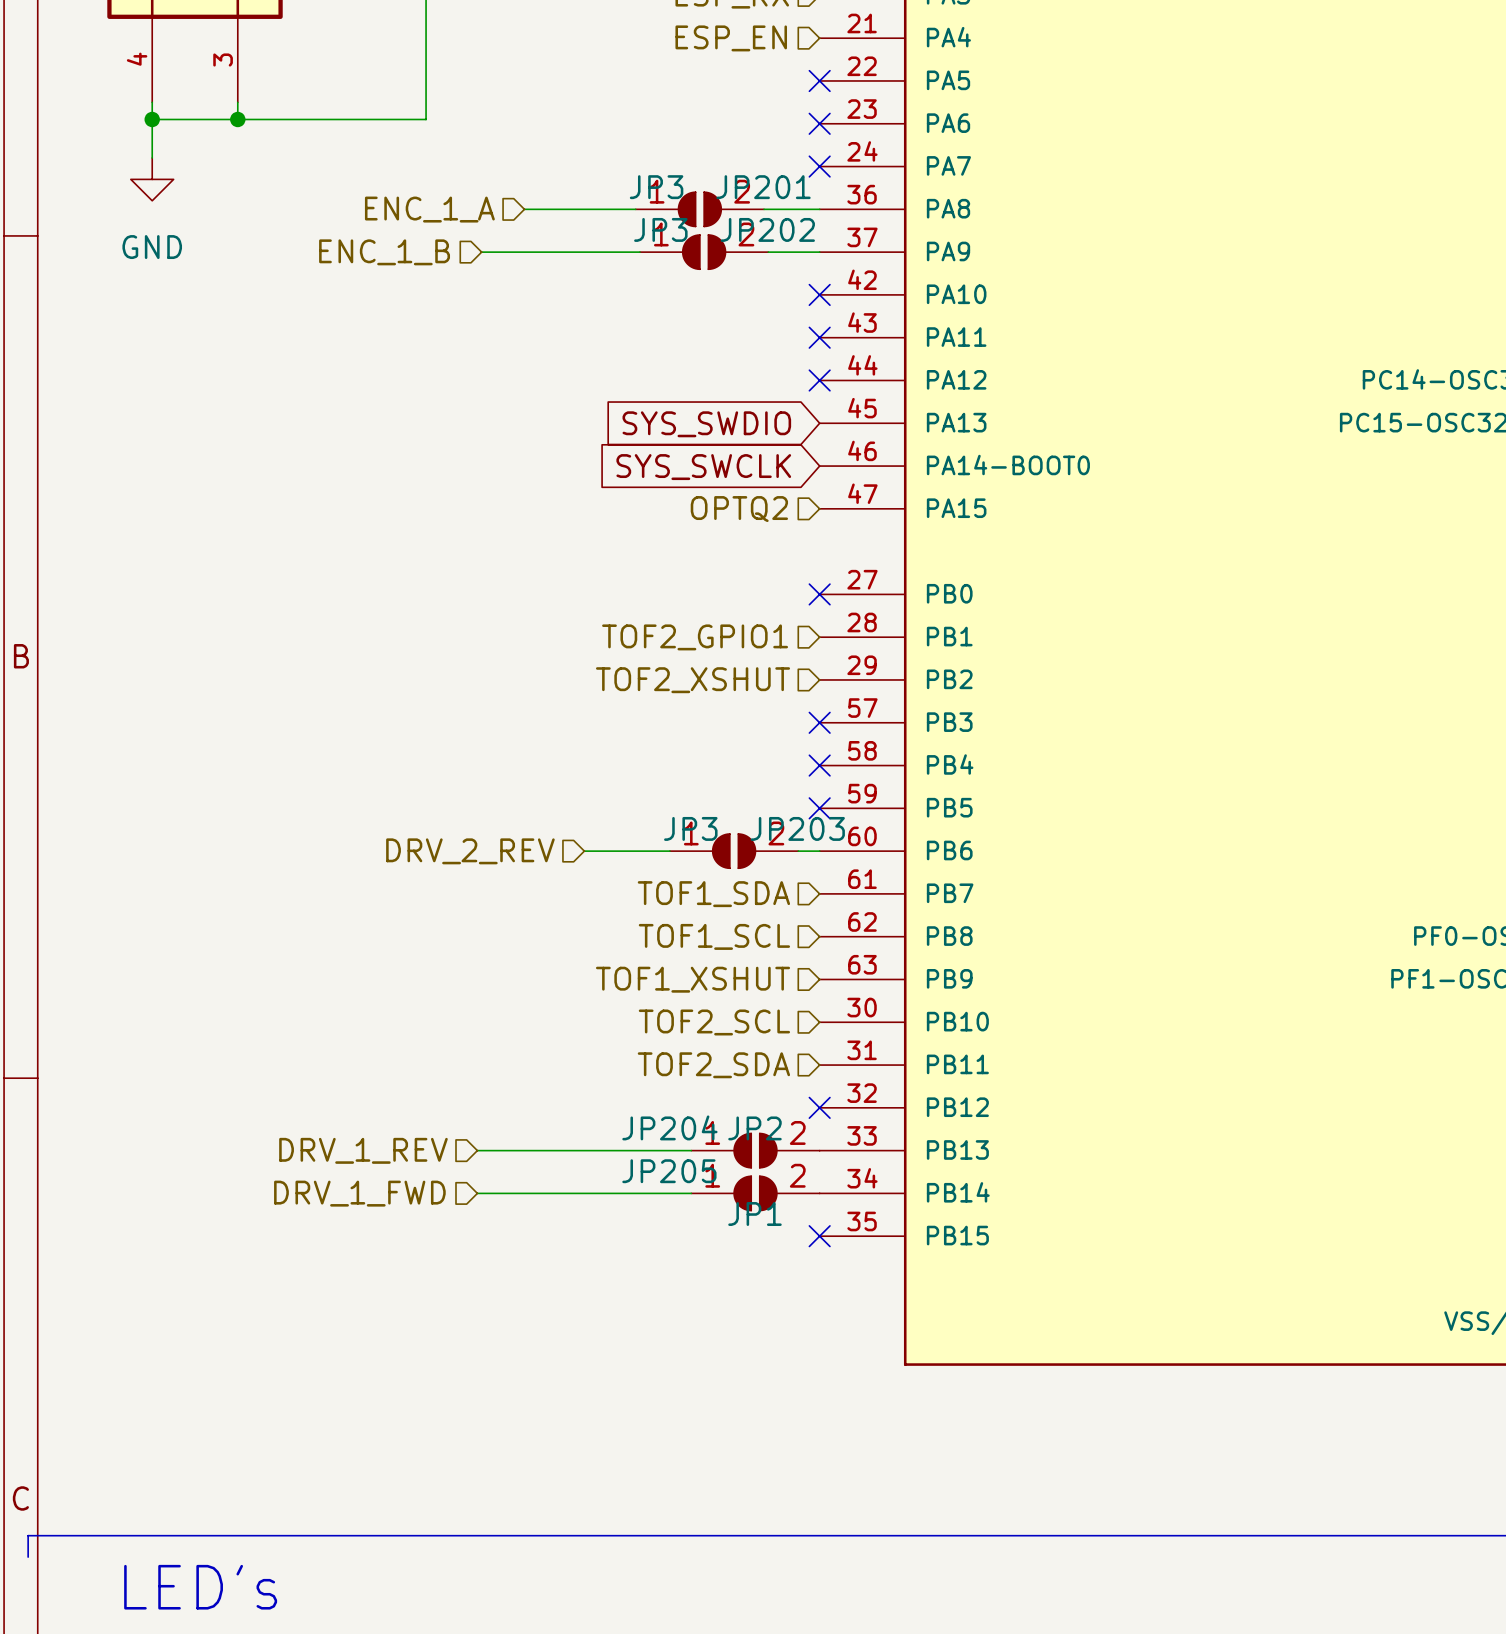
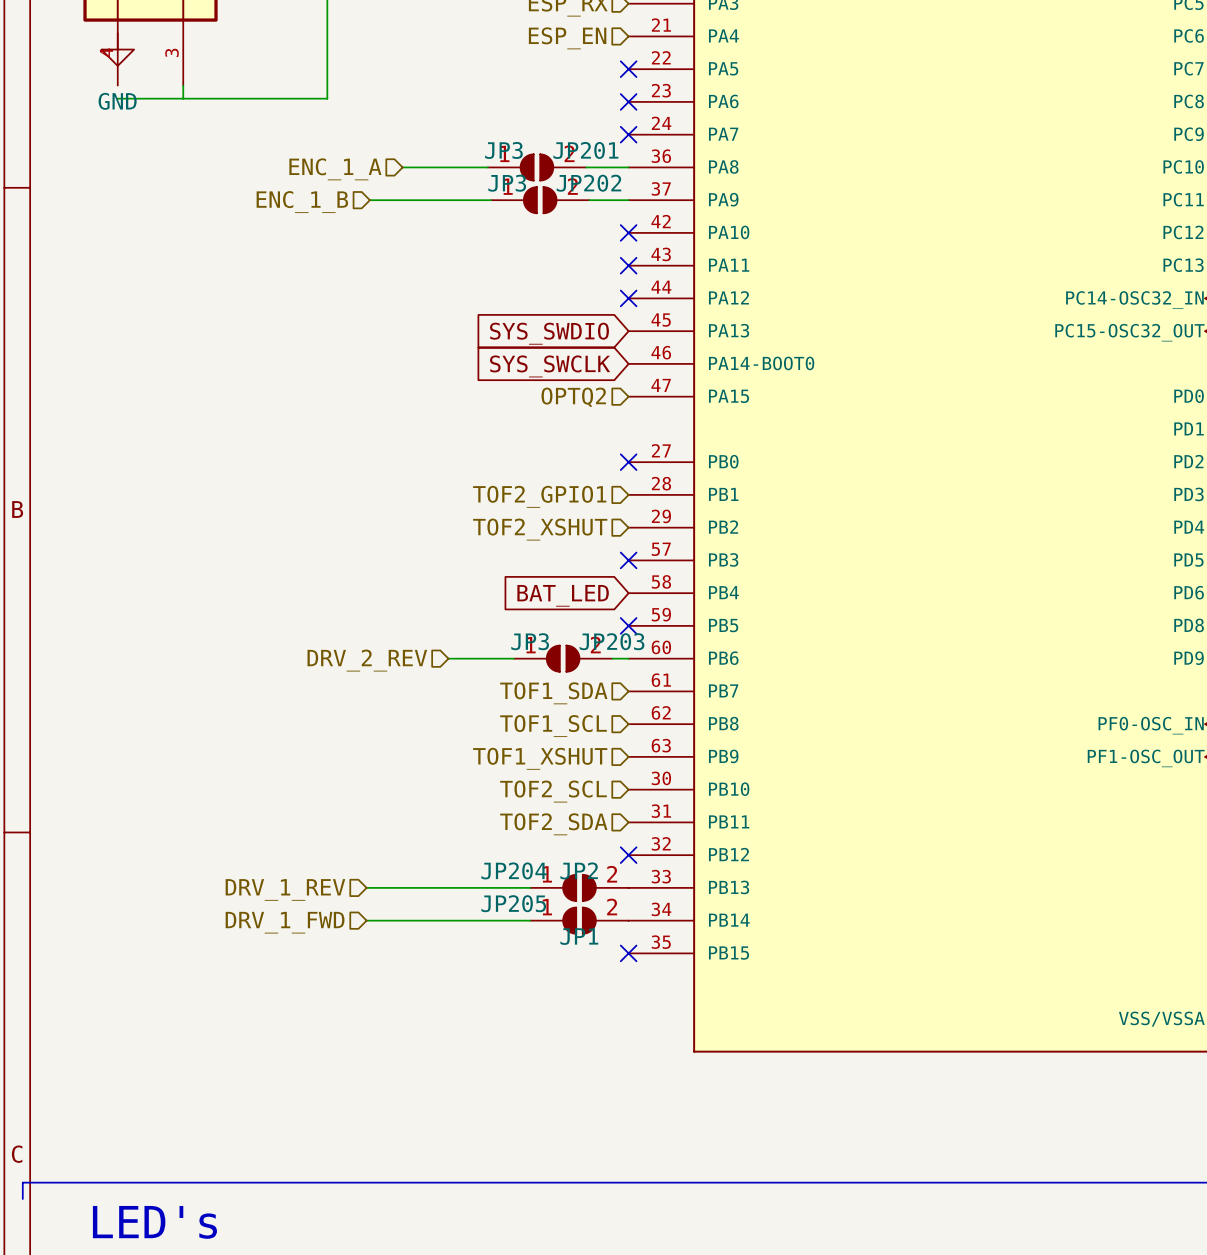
wire: (152, 102) (152, 158) -> none
junction: (152, 119) -> none
junction: (237, 119) -> none
power symbol position: GND (152, 179) -> GND (117, 49)
no-connect mark: (819, 765) -> none
global label: none -> BAT_LED (563, 595)

